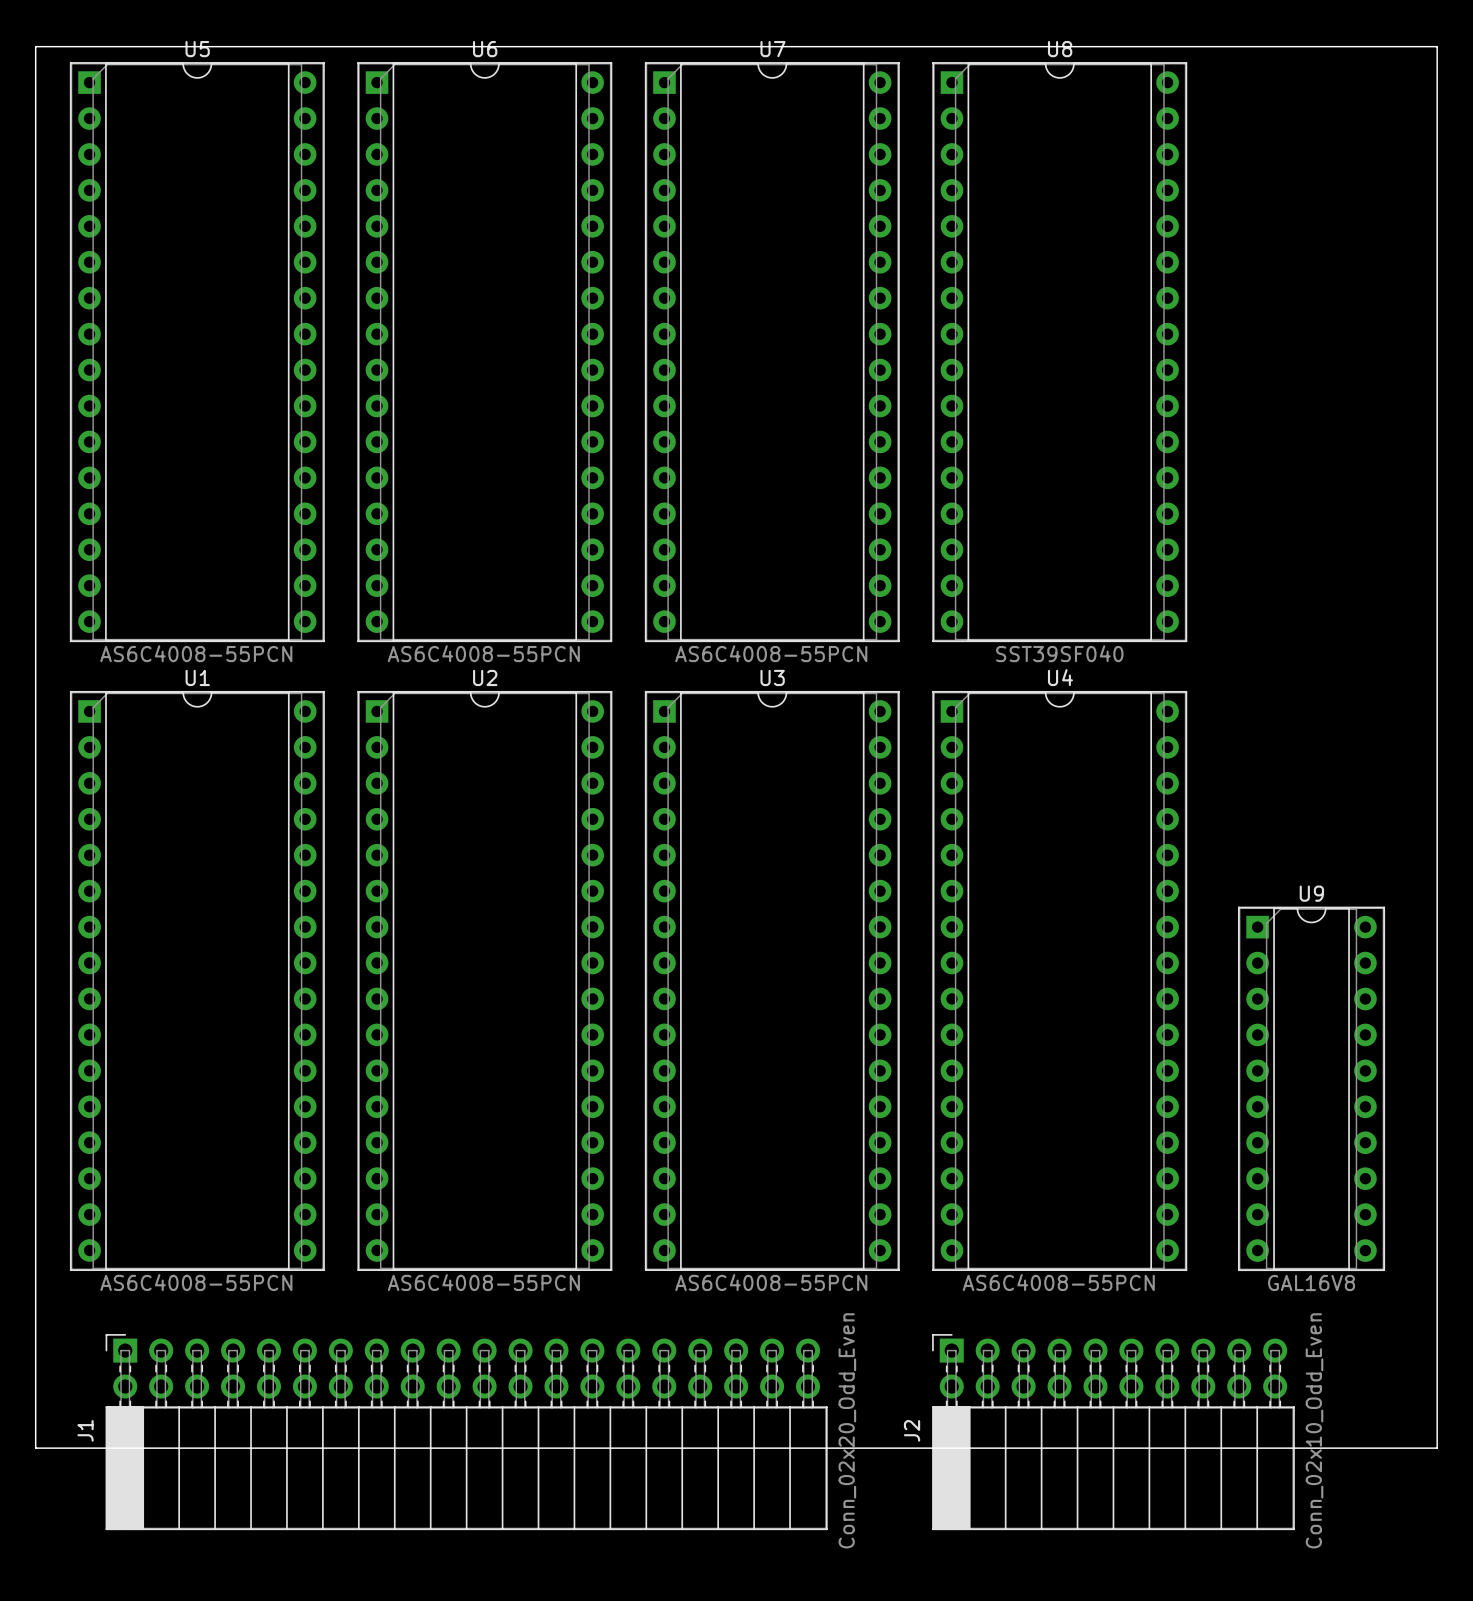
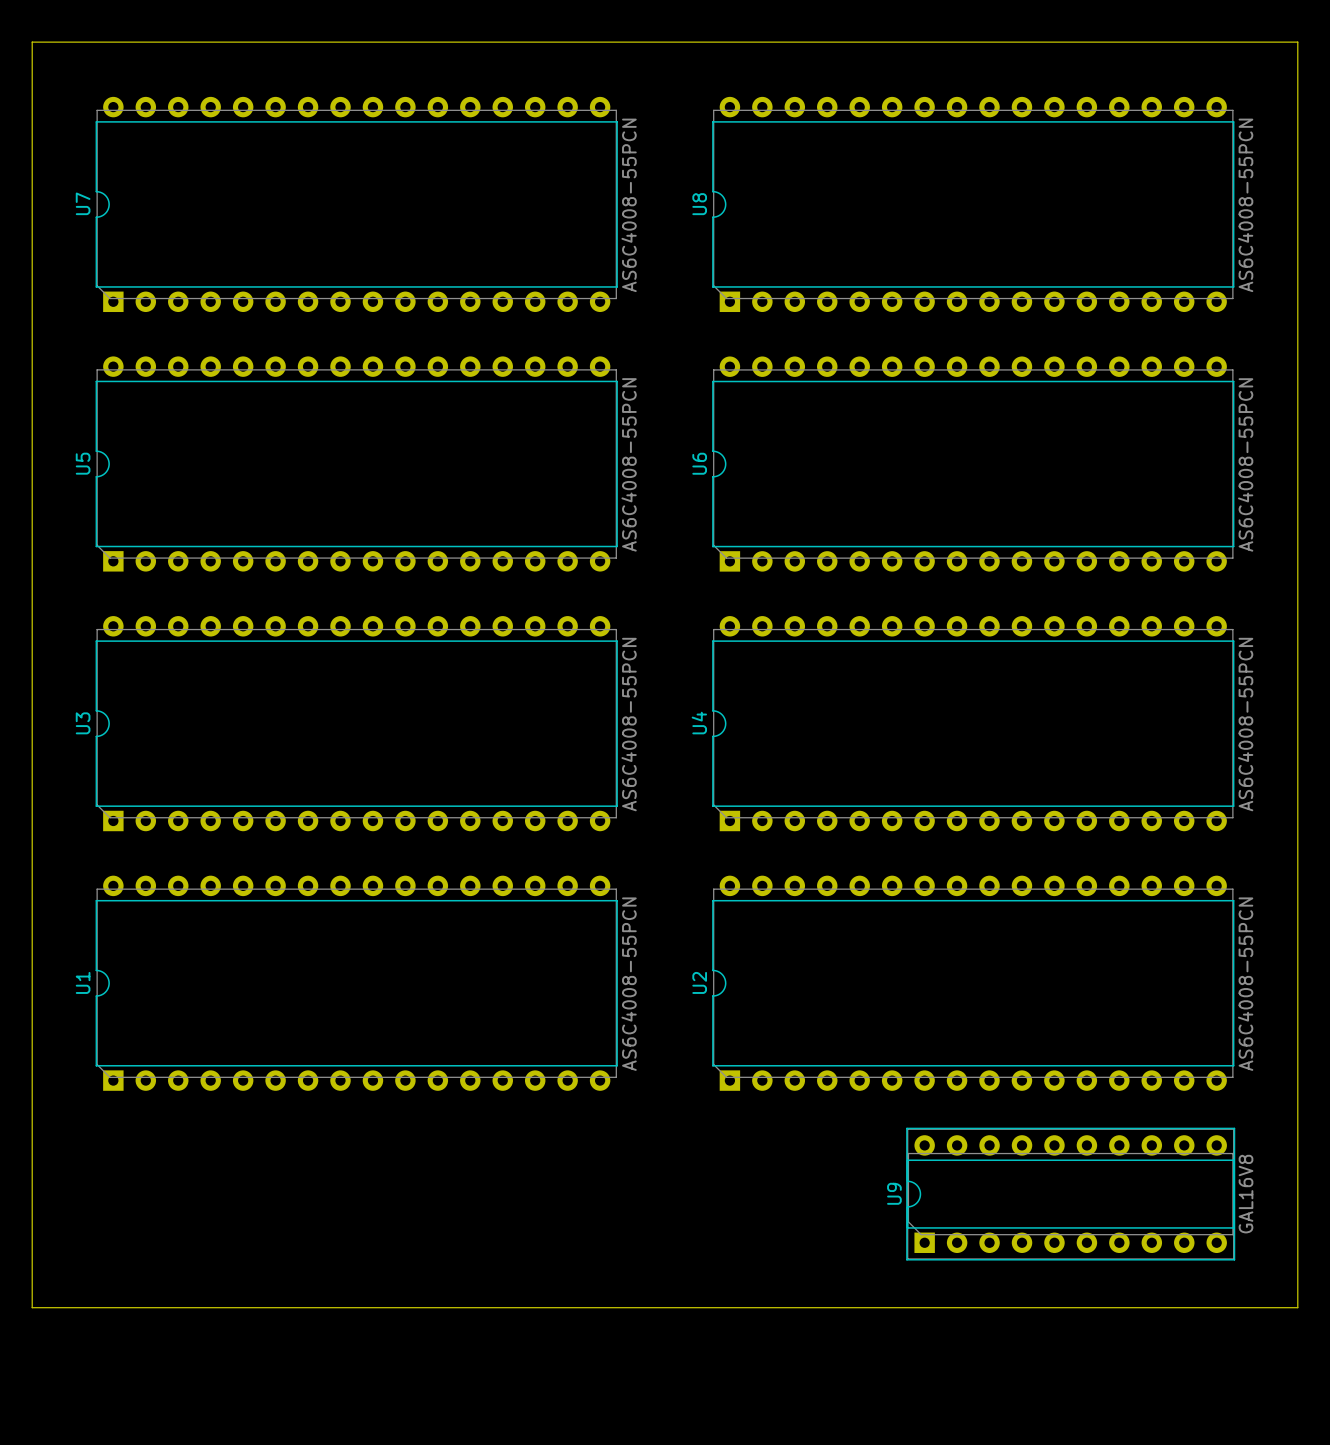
U5 name position: U5 (197, 49) -> U5 (83, 463)
U6 name position: U6 (485, 49) -> U6 (699, 463)
U7 name position: U7 (772, 49) -> U7 (83, 203)
U8 name position: U8 (1060, 49) -> U8 (699, 204)
U5 footprint: [69, 62, 325, 643] -> [95, 356, 618, 572]
U6 footprint: [357, 62, 613, 643] -> [712, 356, 1235, 572]
U7 footprint: [644, 62, 900, 643] -> [95, 96, 618, 313]
U8 footprint: [932, 62, 1188, 643] -> [712, 96, 1235, 313]
U5 value position: AS6C4008-55PCN (196, 653) -> AS6C4008-55PCN (629, 464)
U6 value position: AS6C4008-55PCN (483, 653) -> AS6C4008-55PCN (1245, 464)
U7 value position: AS6C4008-55PCN (771, 653) -> AS6C4008-55PCN (629, 205)
U8 value: SST39SF040 (1059, 653) -> AS6C4008-55PCN (1245, 205)
U1 name position: U1 (197, 677) -> U1 (83, 982)
U2 name position: U2 (485, 677) -> U2 (699, 982)
U3 name position: U3 (772, 677) -> U3 (83, 723)
U4 name position: U4 (1060, 677) -> U4 (699, 723)
U1 footprint: [69, 690, 325, 1272] -> [95, 875, 618, 1091]
U2 footprint: [357, 690, 613, 1272] -> [712, 875, 1235, 1091]
U3 footprint: [644, 690, 900, 1272] -> [95, 616, 618, 832]
U4 footprint: [932, 690, 1188, 1272] -> [712, 616, 1235, 832]
U9 rotation: 0° (1311, 1088) -> 90° counterclockwise (1070, 1194)
U9 position: (1311, 1088) -> (1070, 1194)
U1 value position: AS6C4008-55PCN (196, 1282) -> AS6C4008-55PCN (629, 984)
U2 value position: AS6C4008-55PCN (483, 1282) -> AS6C4008-55PCN (1245, 984)
U3 value position: AS6C4008-55PCN (771, 1282) -> AS6C4008-55PCN (629, 724)
U4 value position: AS6C4008-55PCN (1058, 1282) -> AS6C4008-55PCN (1245, 724)
J1: Conn_02x20_Odd_Even (466, 1432) -> none
J2: Conn_02x10_Odd_Even (1113, 1432) -> none

